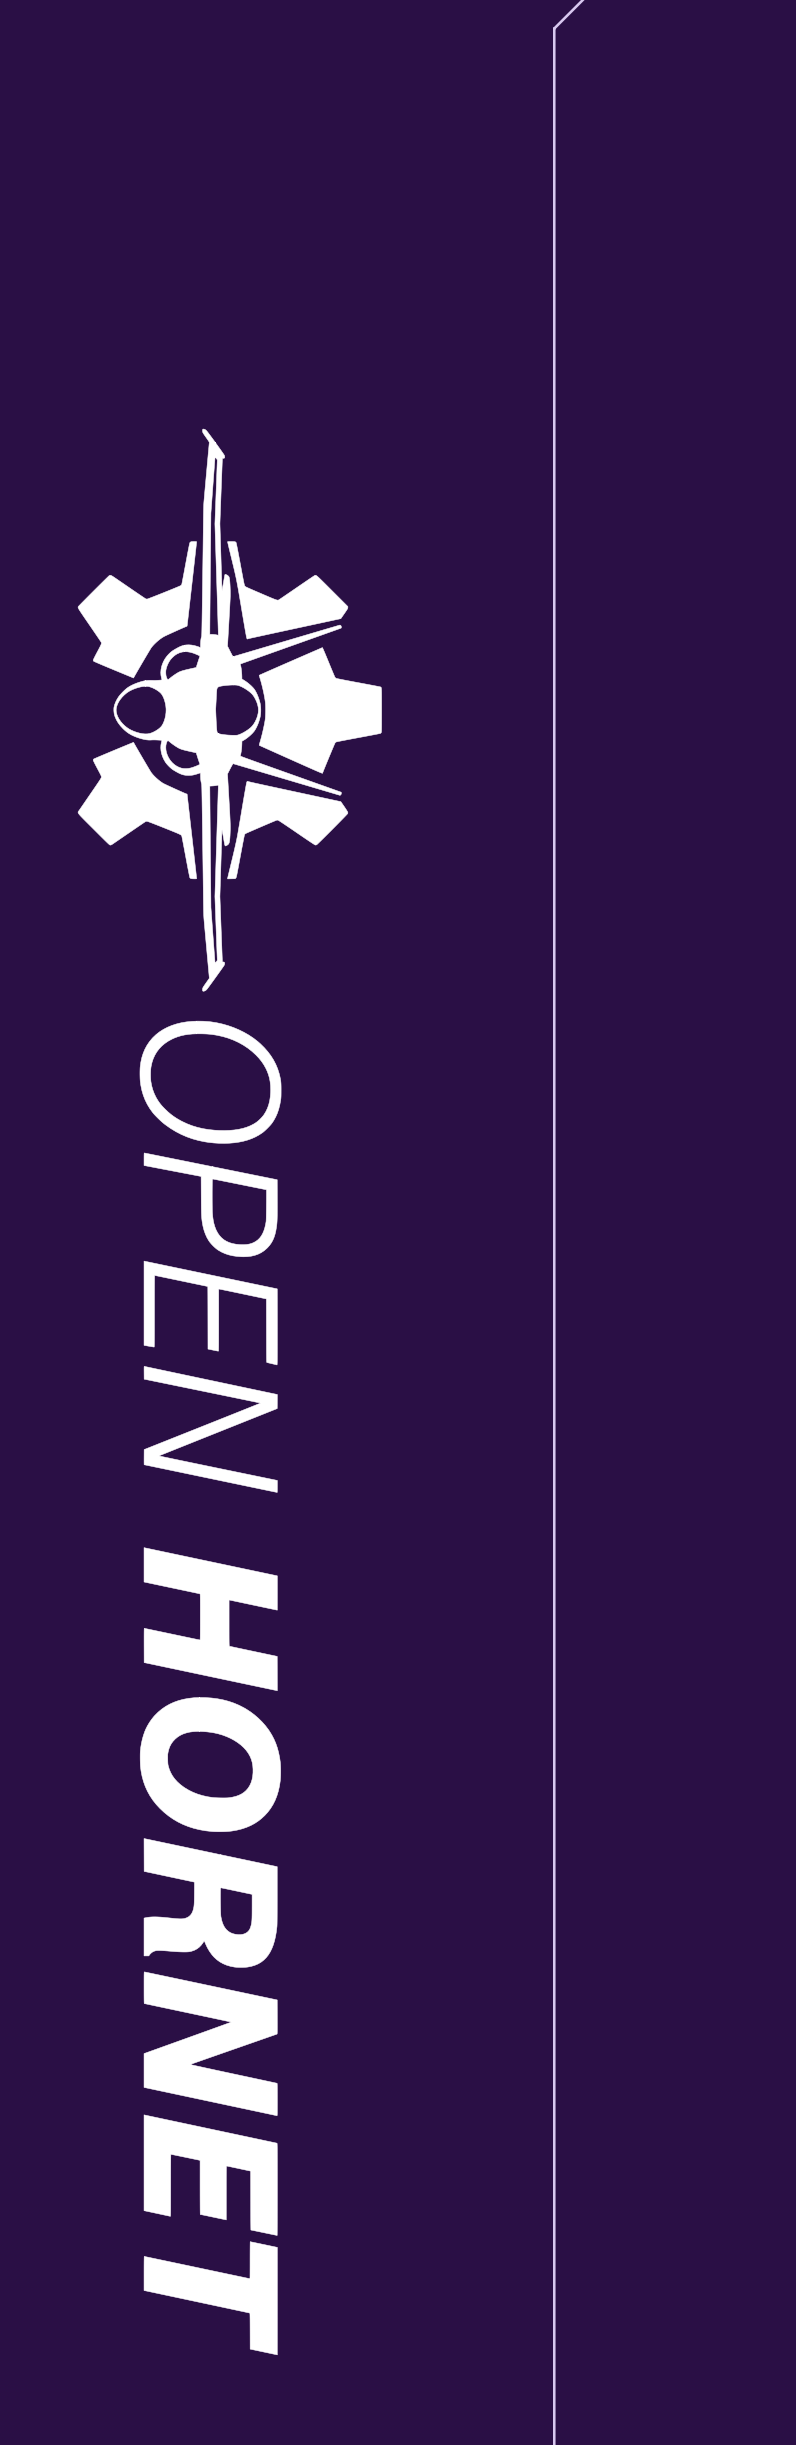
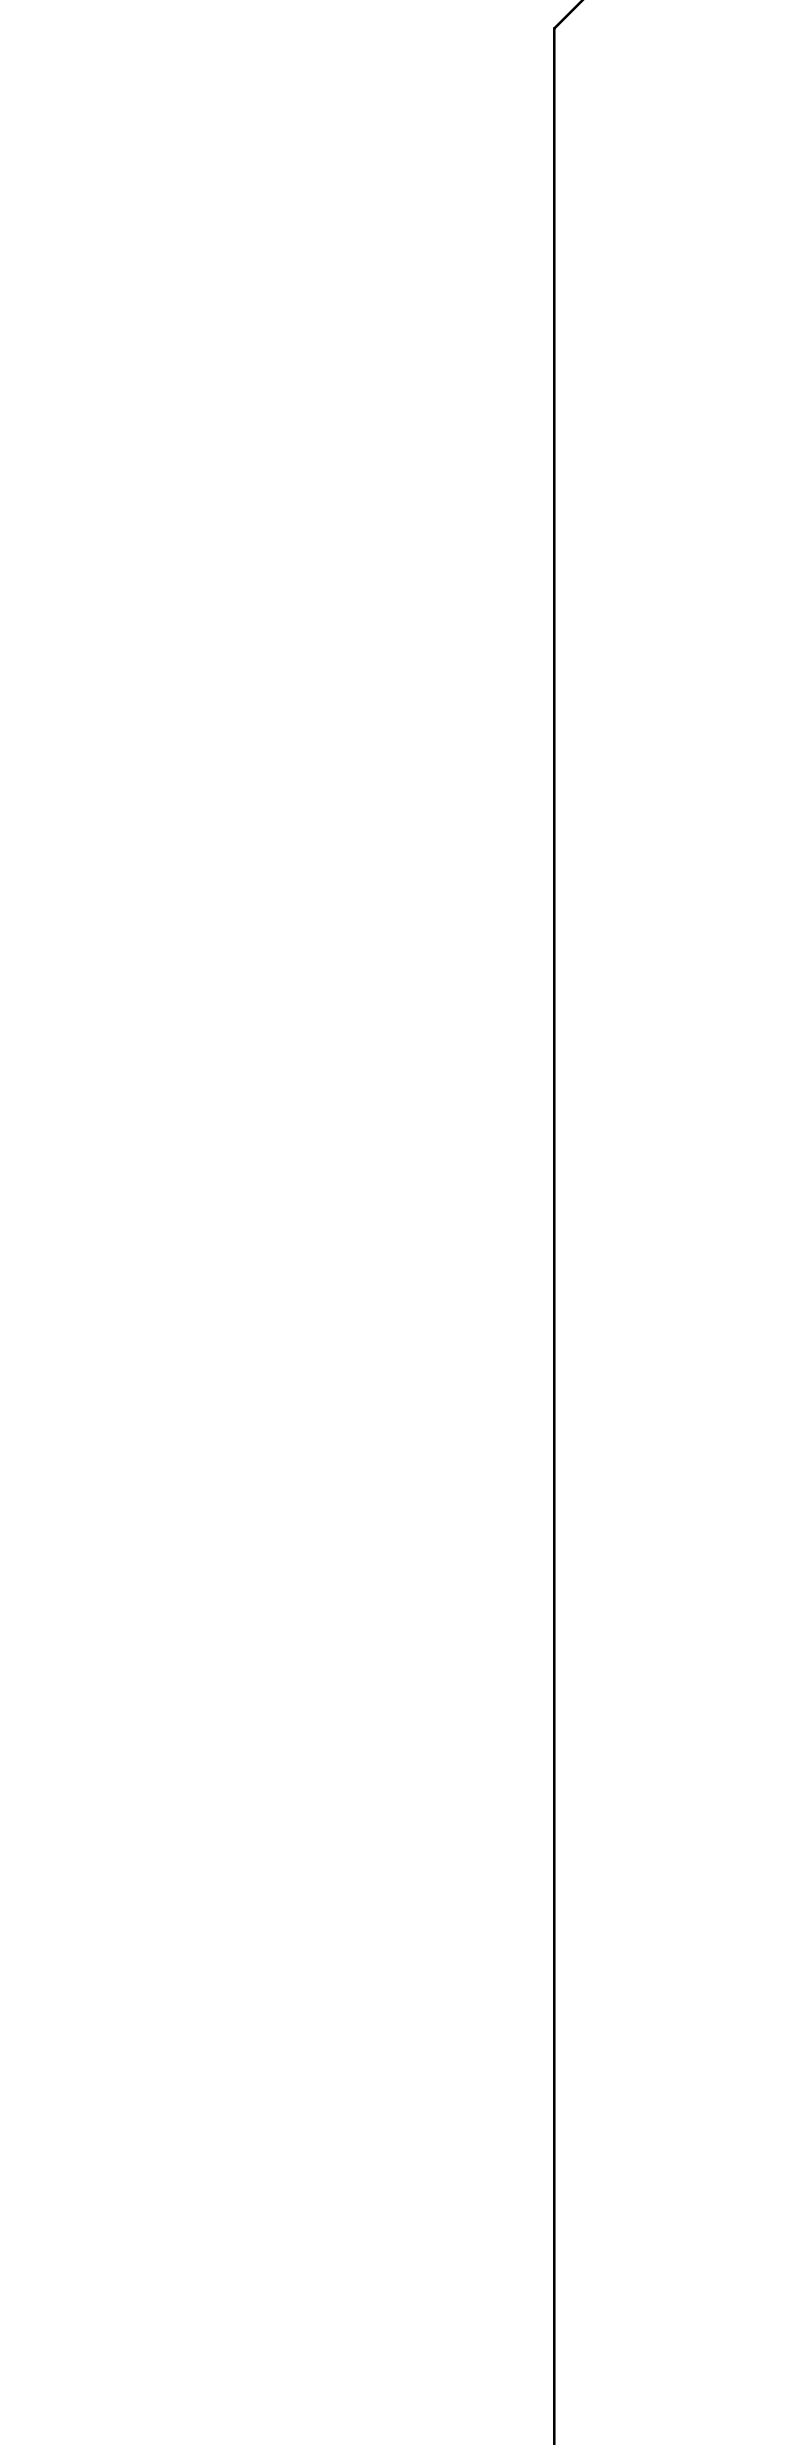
drawing: [77, 428, 382, 2356] -> none

